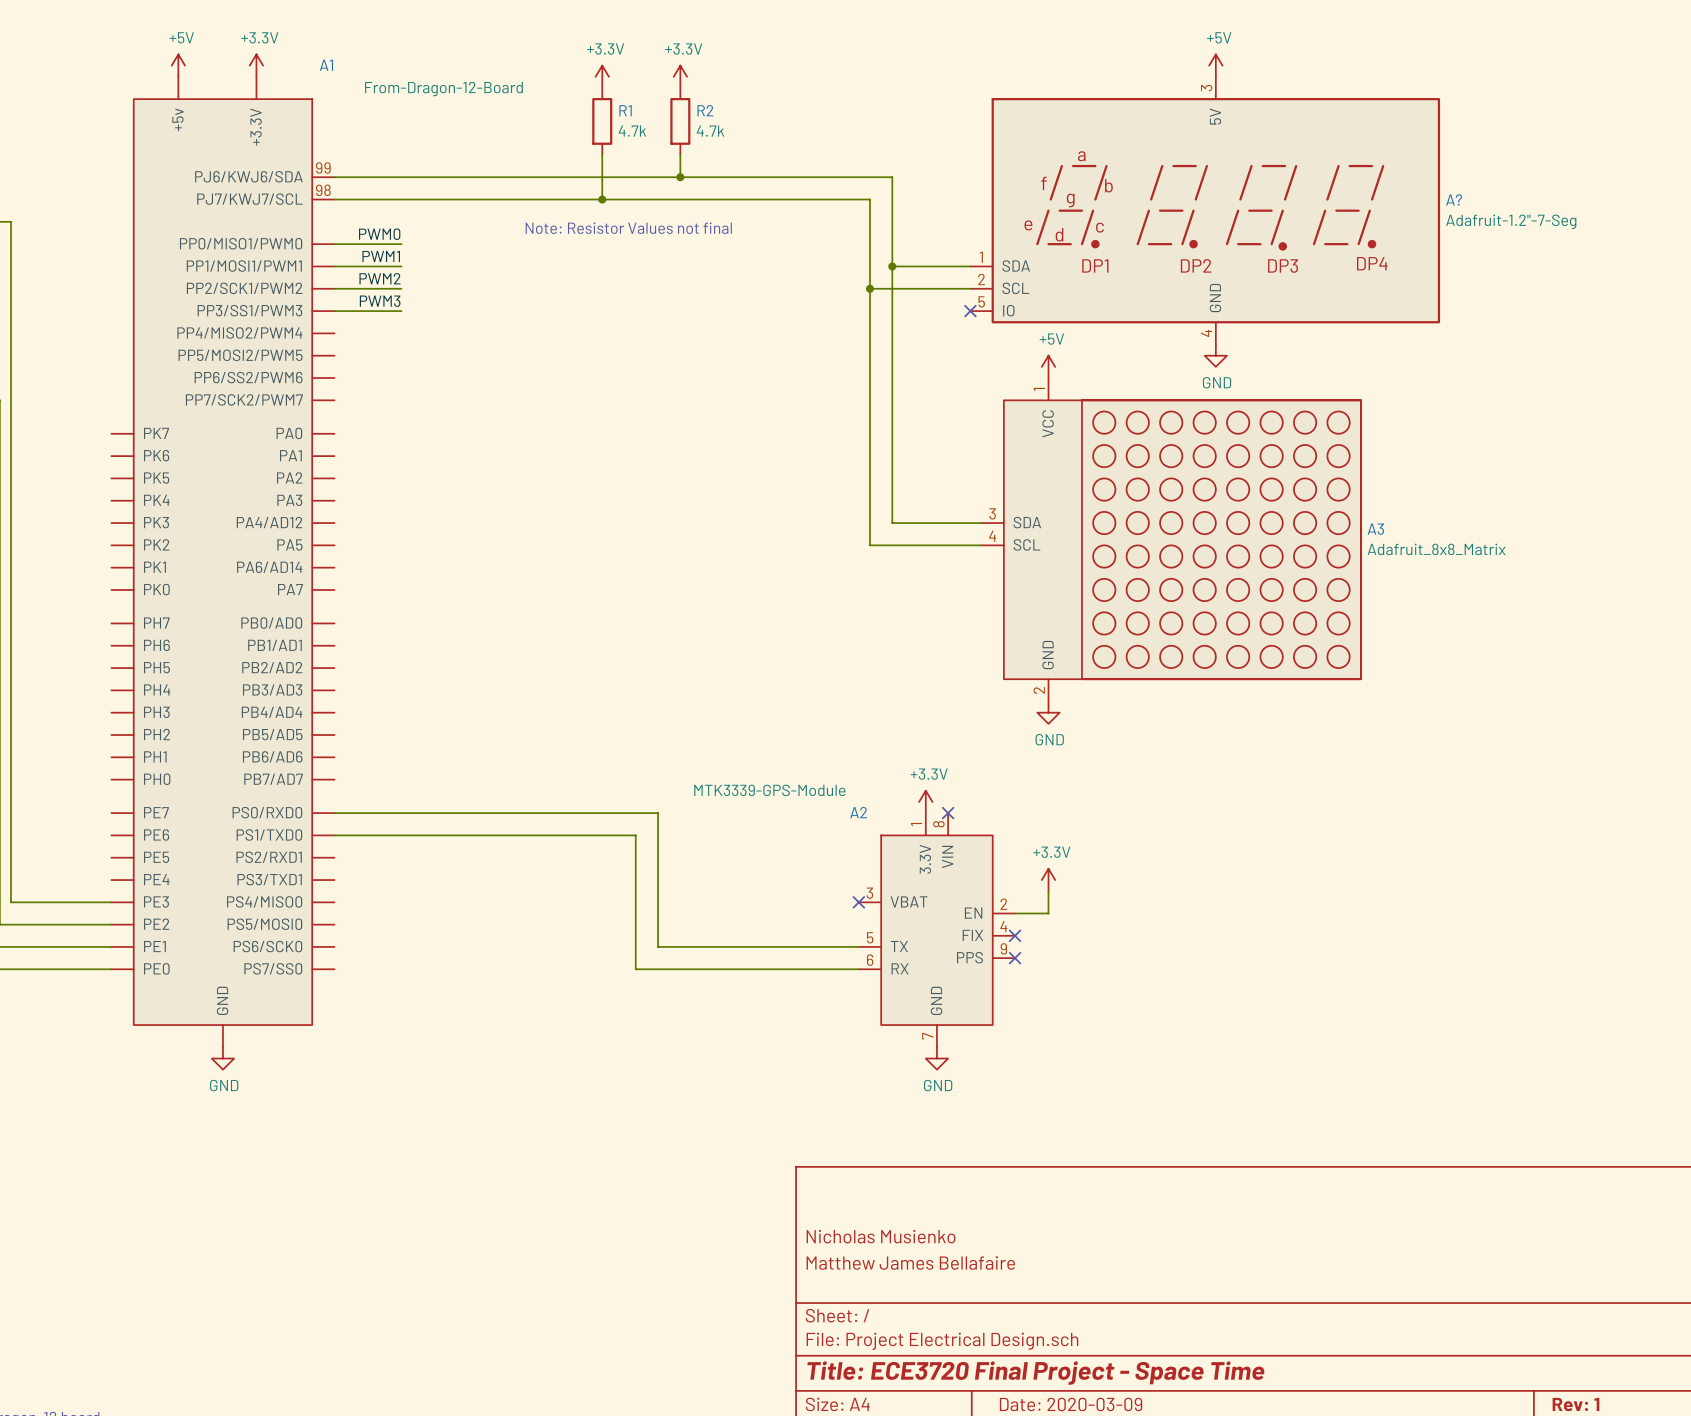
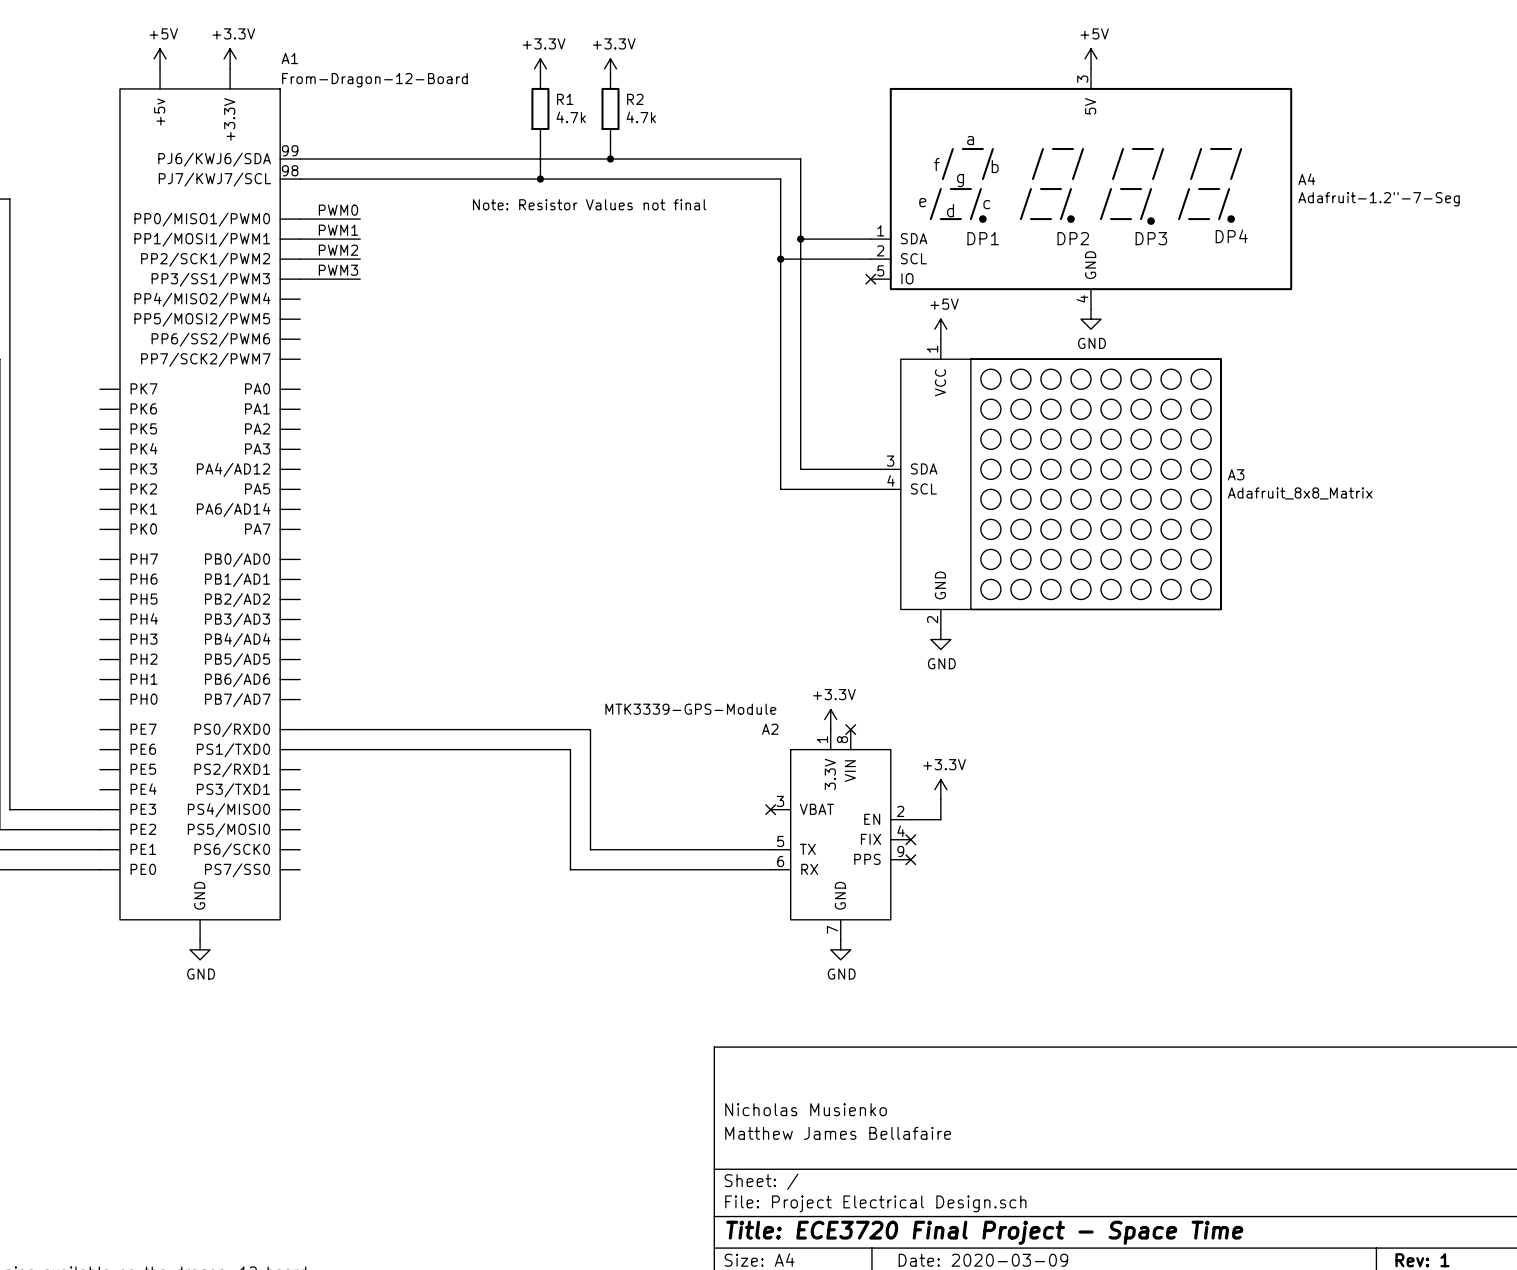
A? name: A? (1454, 199) -> A4 (1306, 179)

